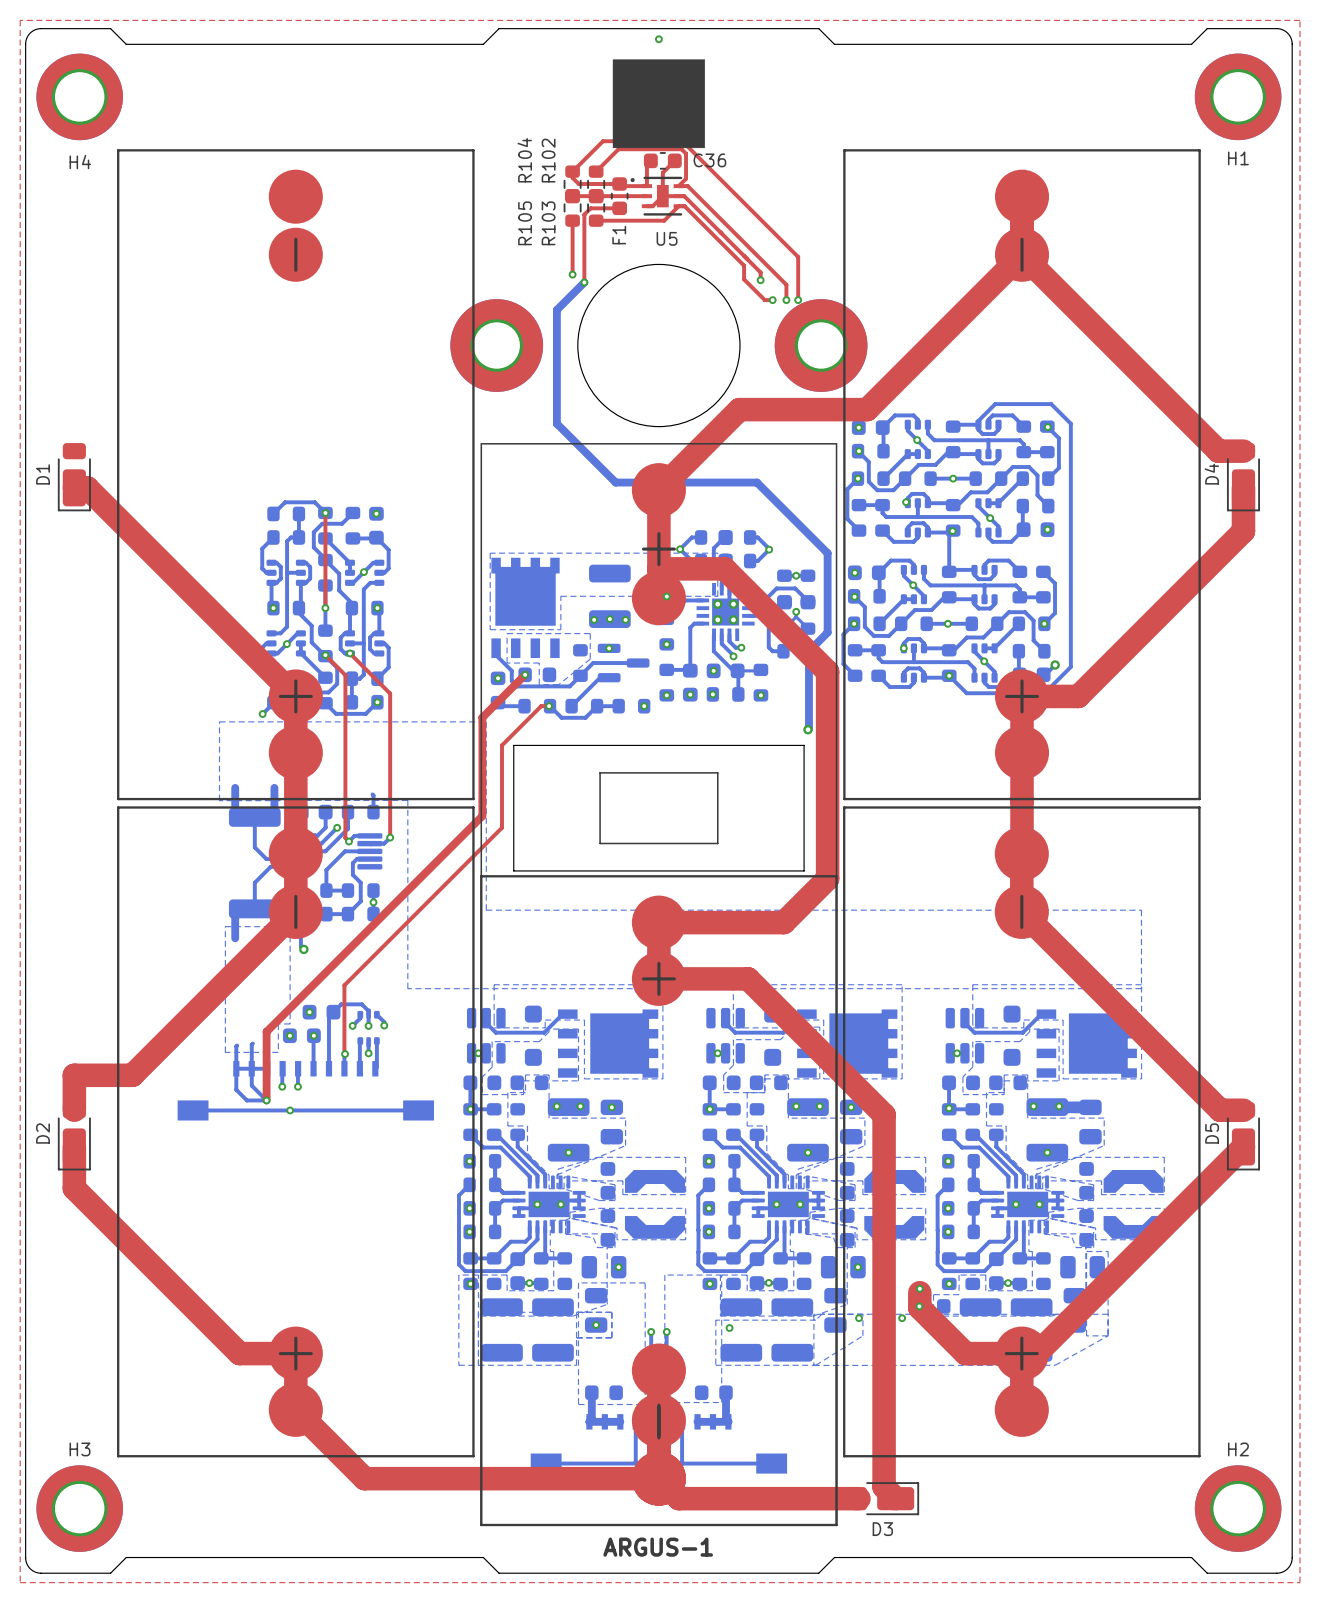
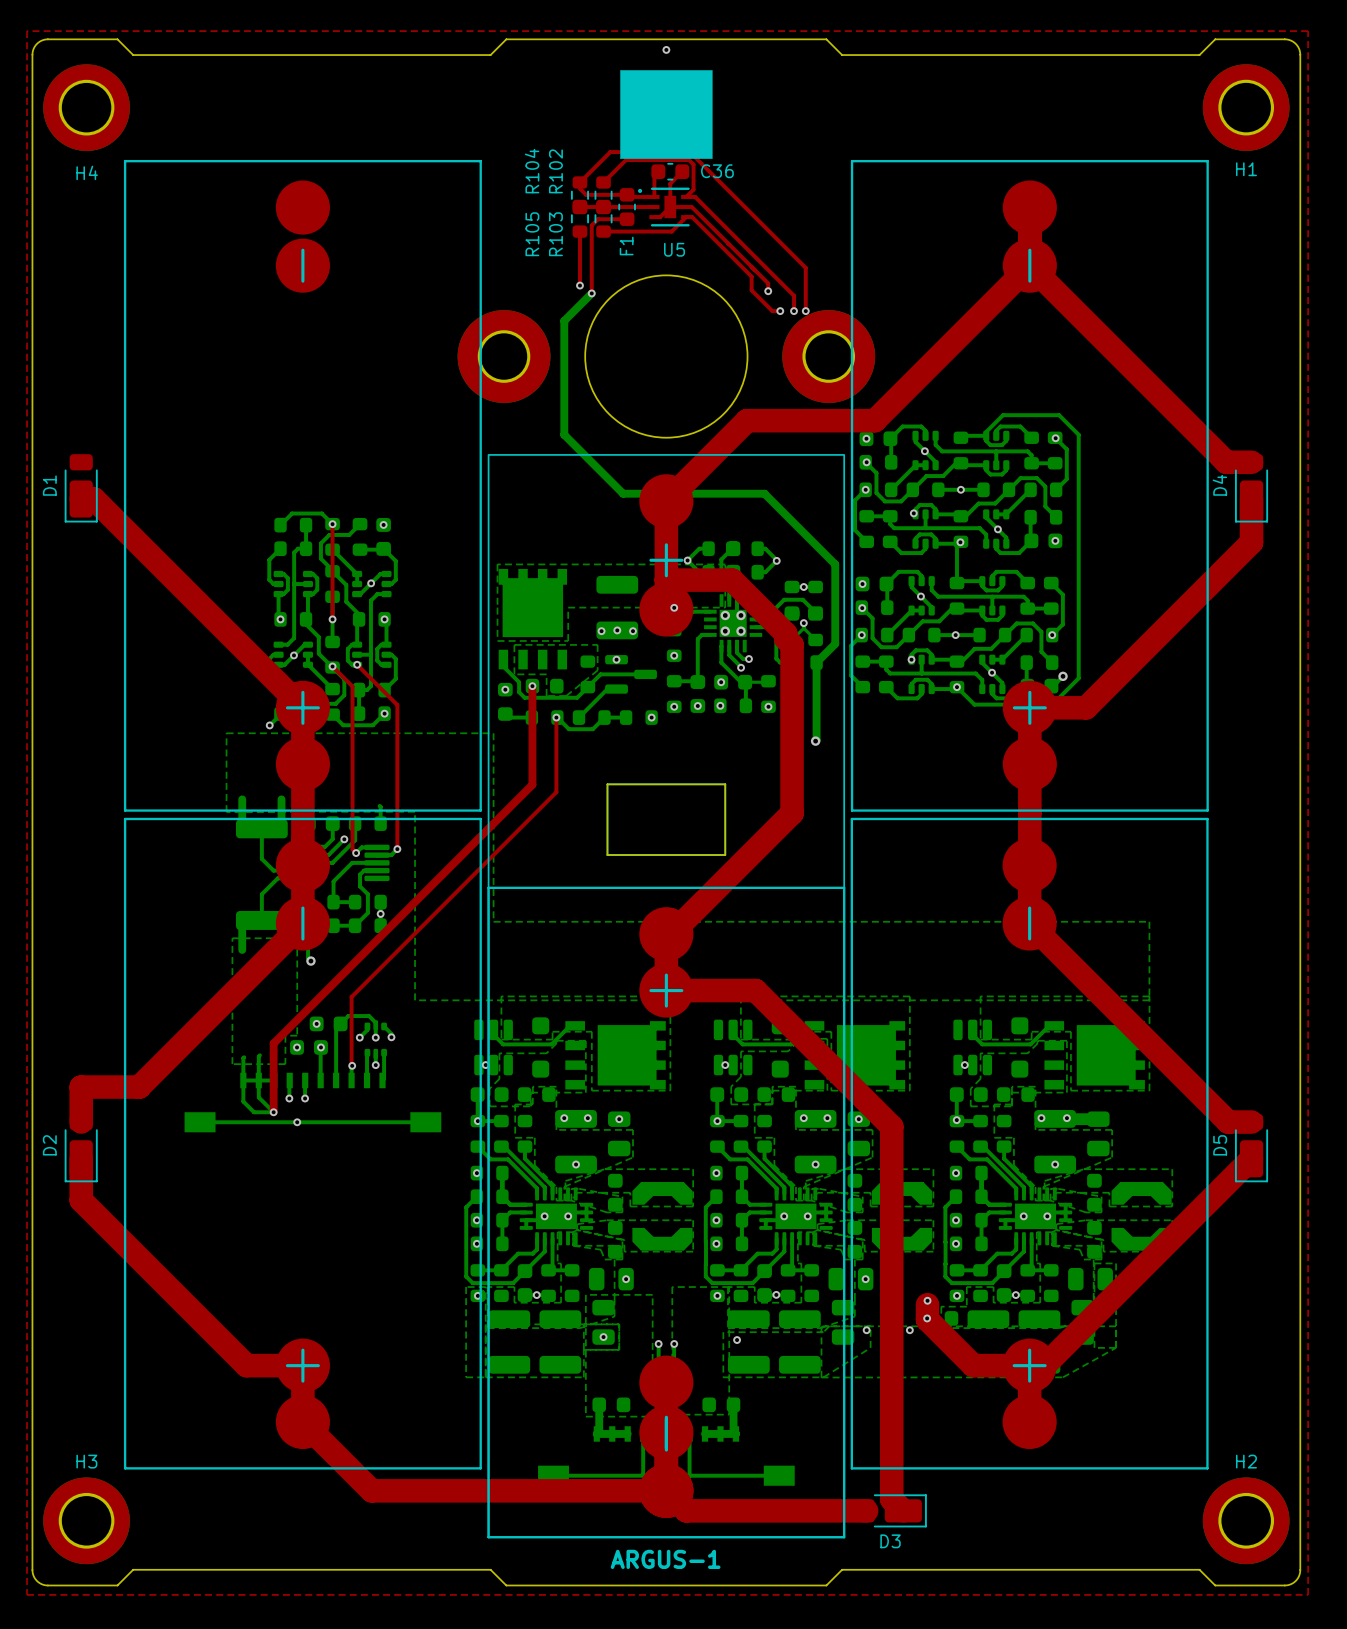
top track: (778, 622) (827, 671) (827, 878) (783, 922) (663, 922) -> (785, 633) (785, 638) (792, 644) (792, 813) (671, 934)
top track: (525, 674) (482, 717) (482, 816) -> (532, 686) (532, 784) (489, 827)
top track: (549, 706) (541, 706) (501, 745) (501, 827) -> (556, 717) (556, 792) (509, 839)
board edge: (513, 745) (804, 745) (804, 870) (513, 870) (513, 745) -> none
board edge: none -> (607, 784) (725, 784) (725, 855) (607, 855) (607, 784)

